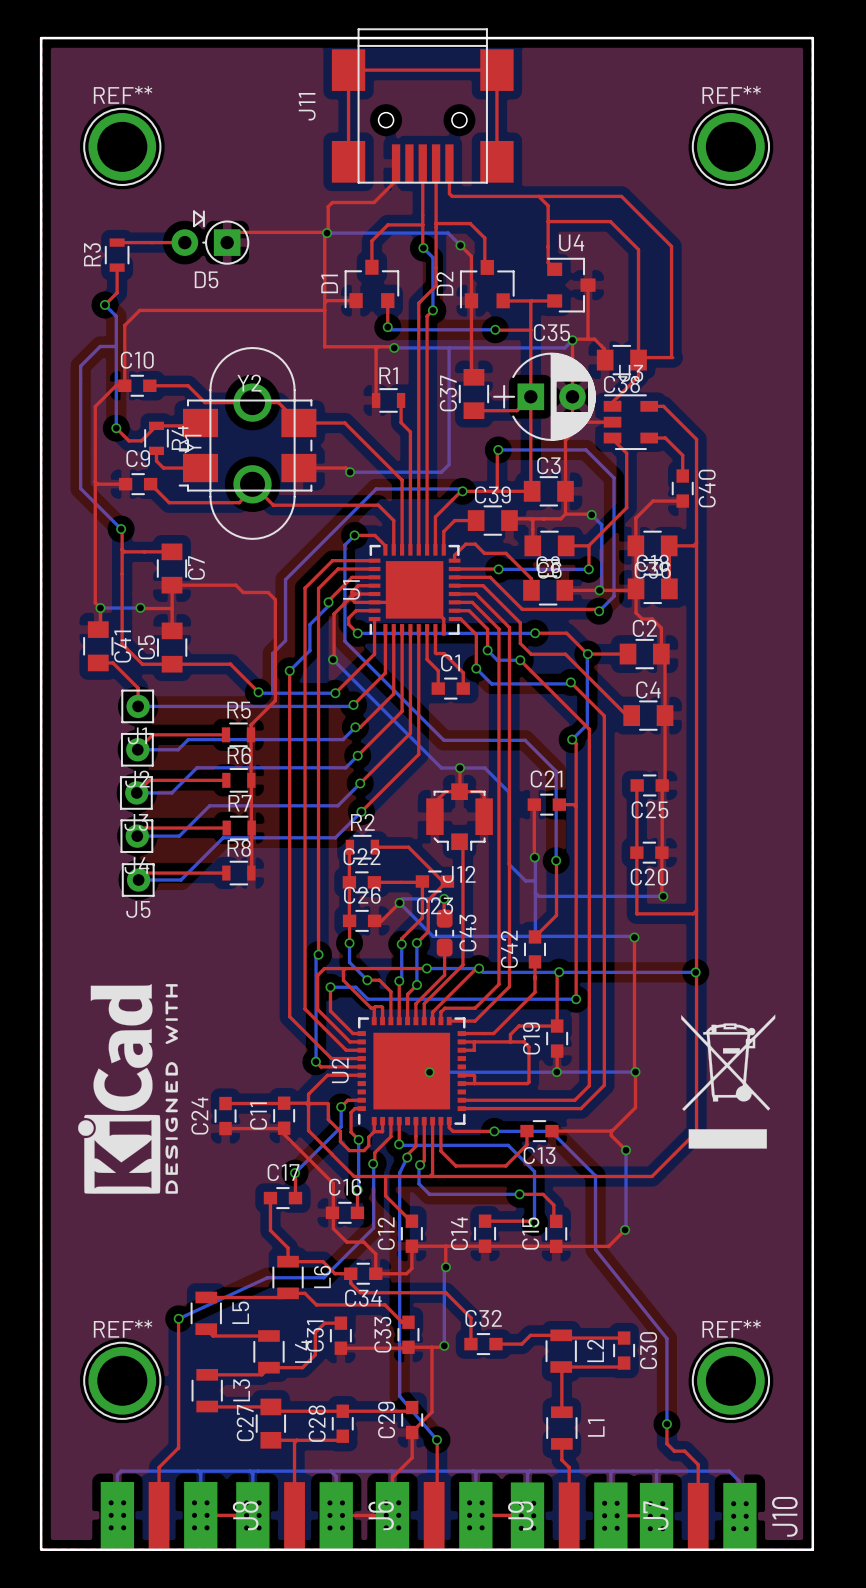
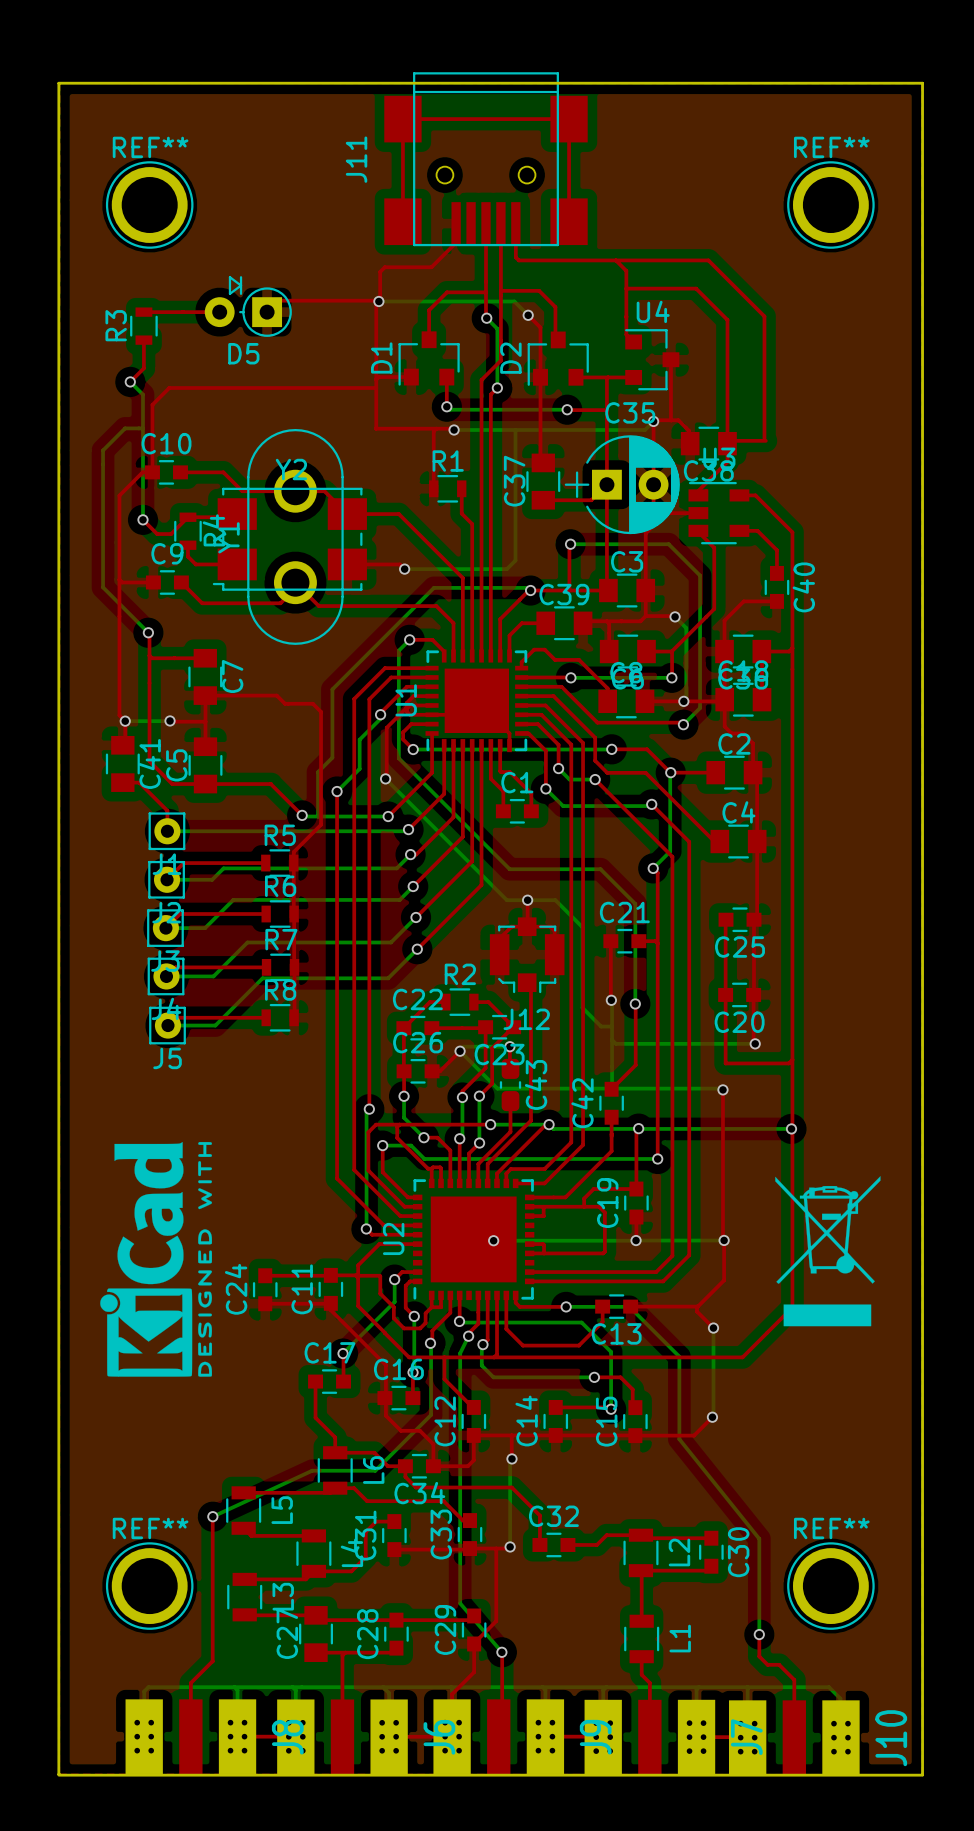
top track: (349, 847) (349, 882) -> (445, 1002) (429, 1002) (403, 1028)
R2 position: (362, 847) -> (459, 1002)
top track: (374, 847) (408, 847) (442, 881) (447, 881) -> (473, 1002) (488, 1002) (513, 1027)

